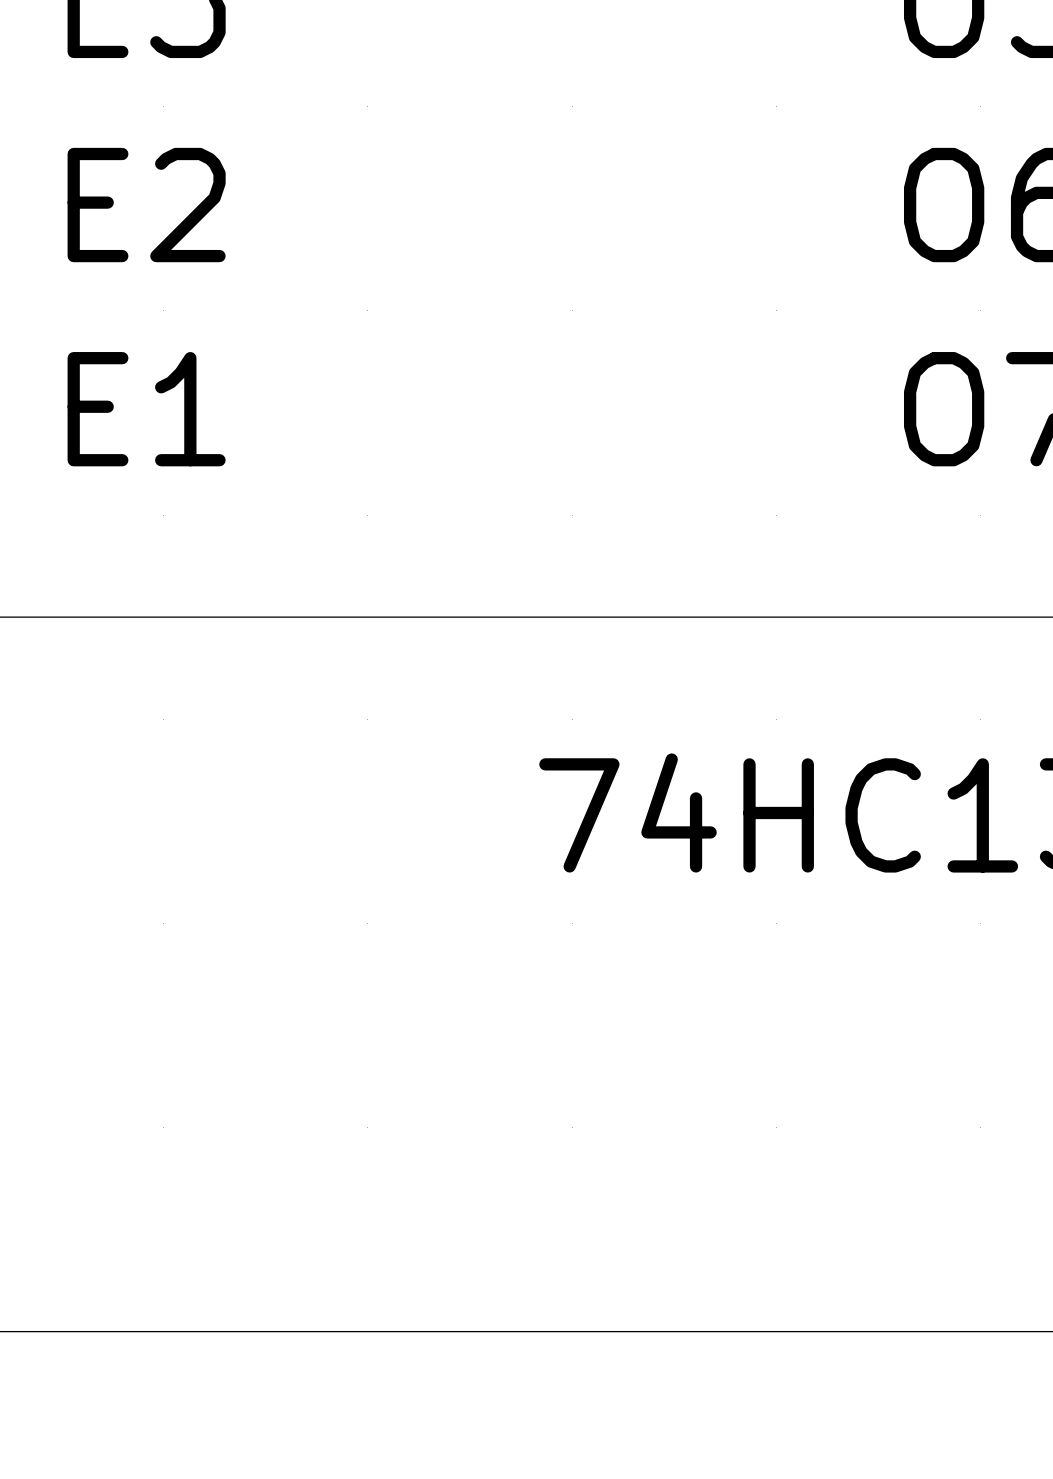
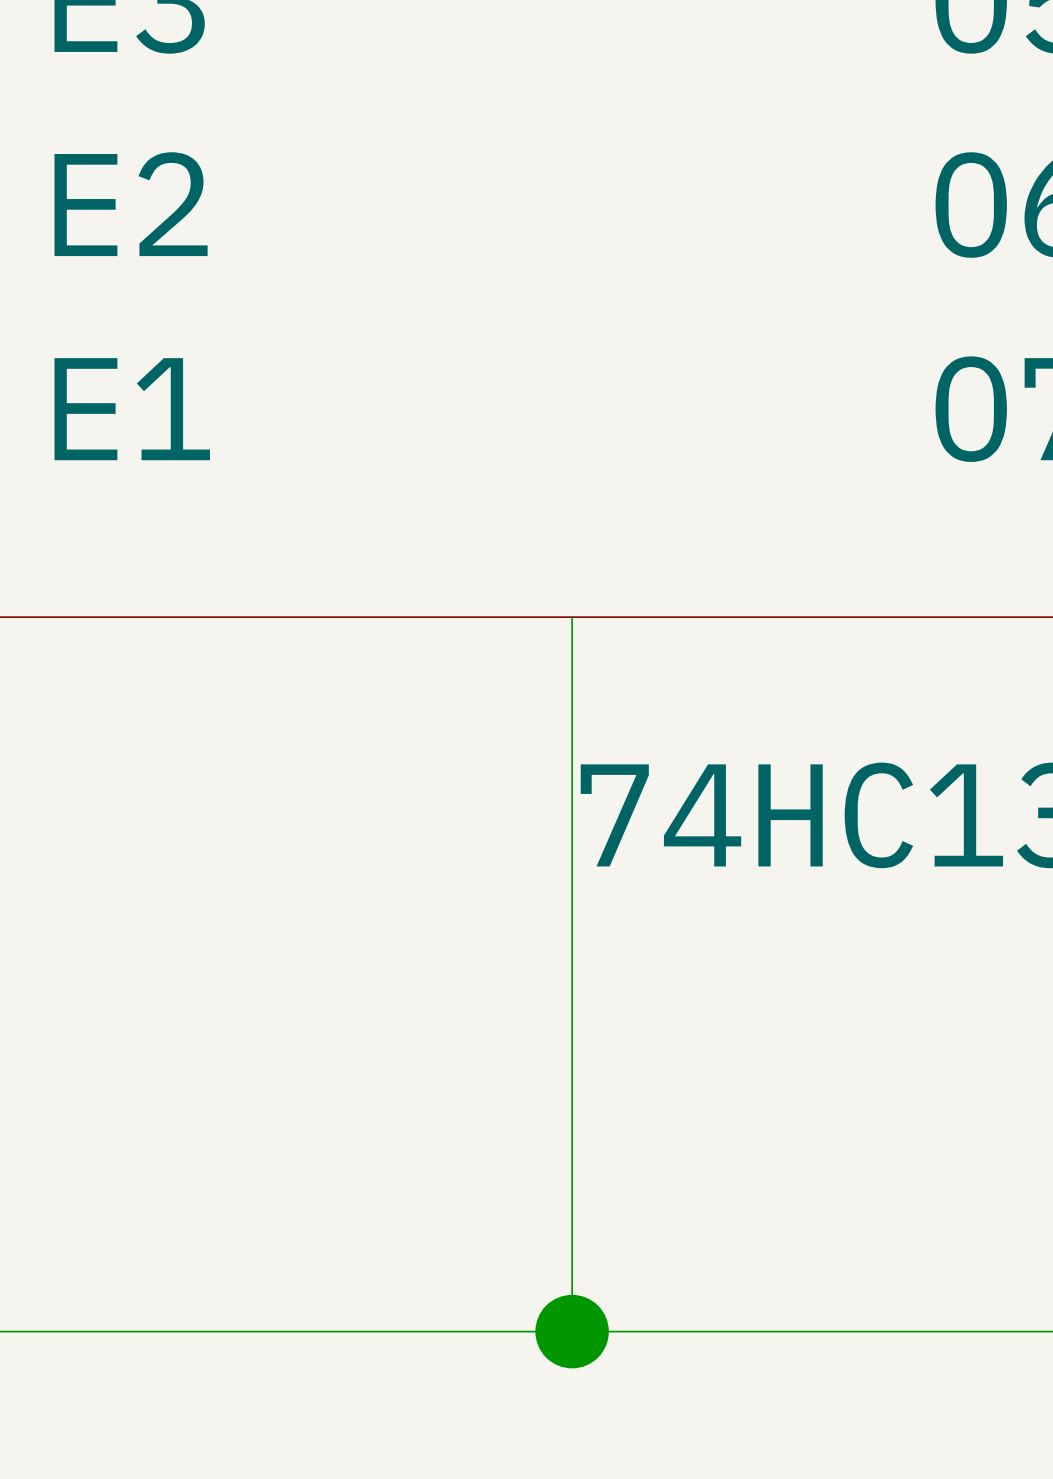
wire: none -> (572, 617) (572, 1331)
junction: none -> (572, 1331)

